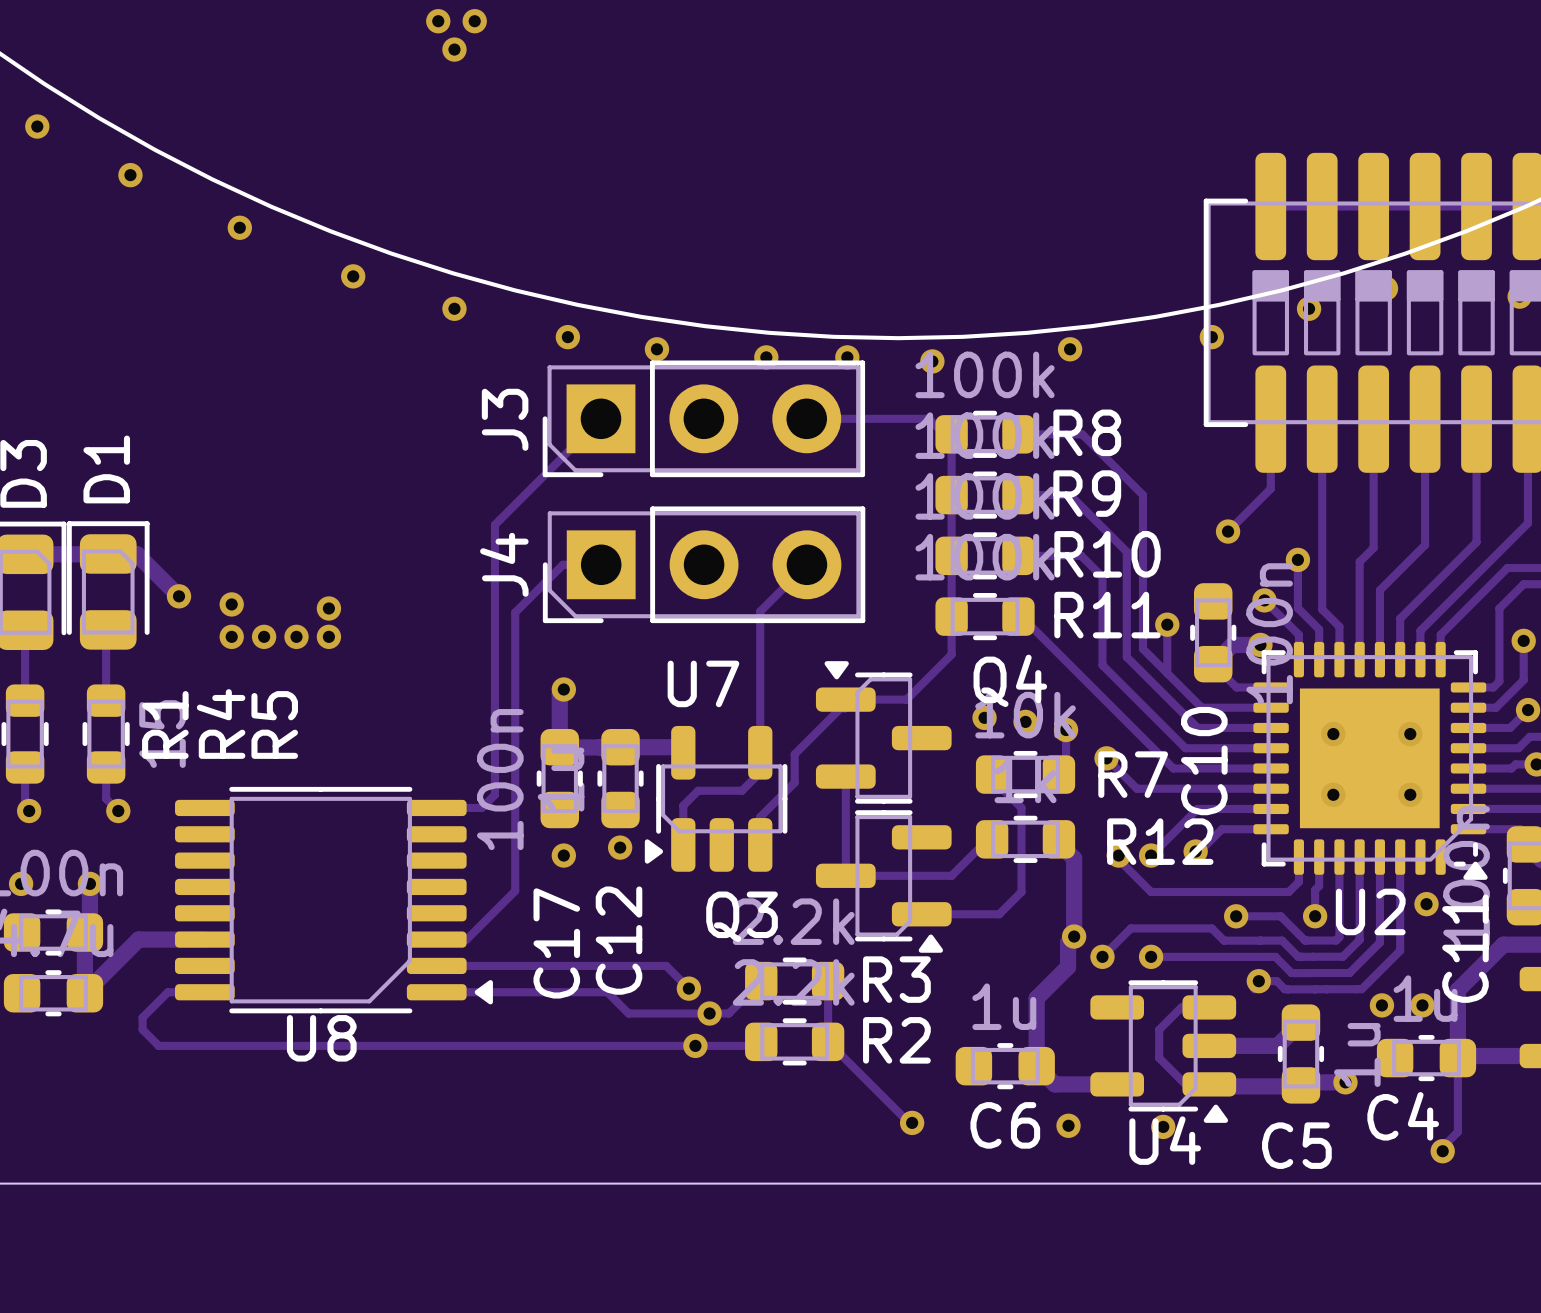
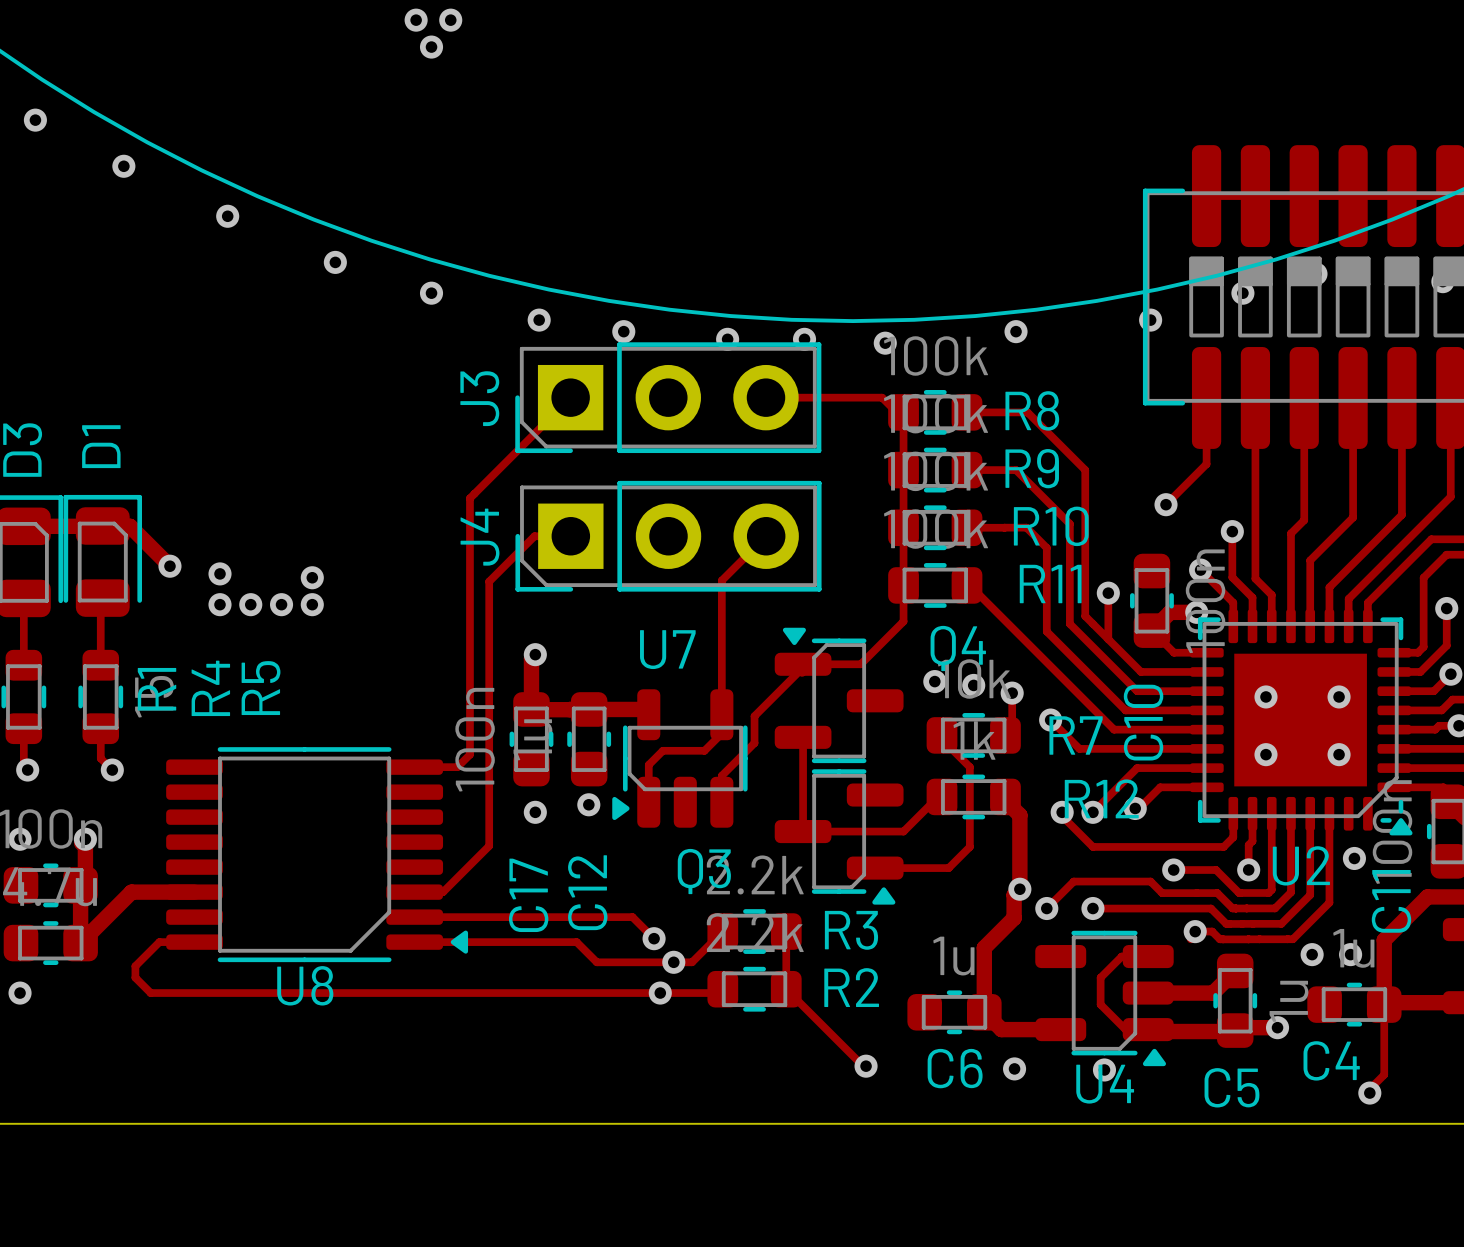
via: none -> (20, 993)

